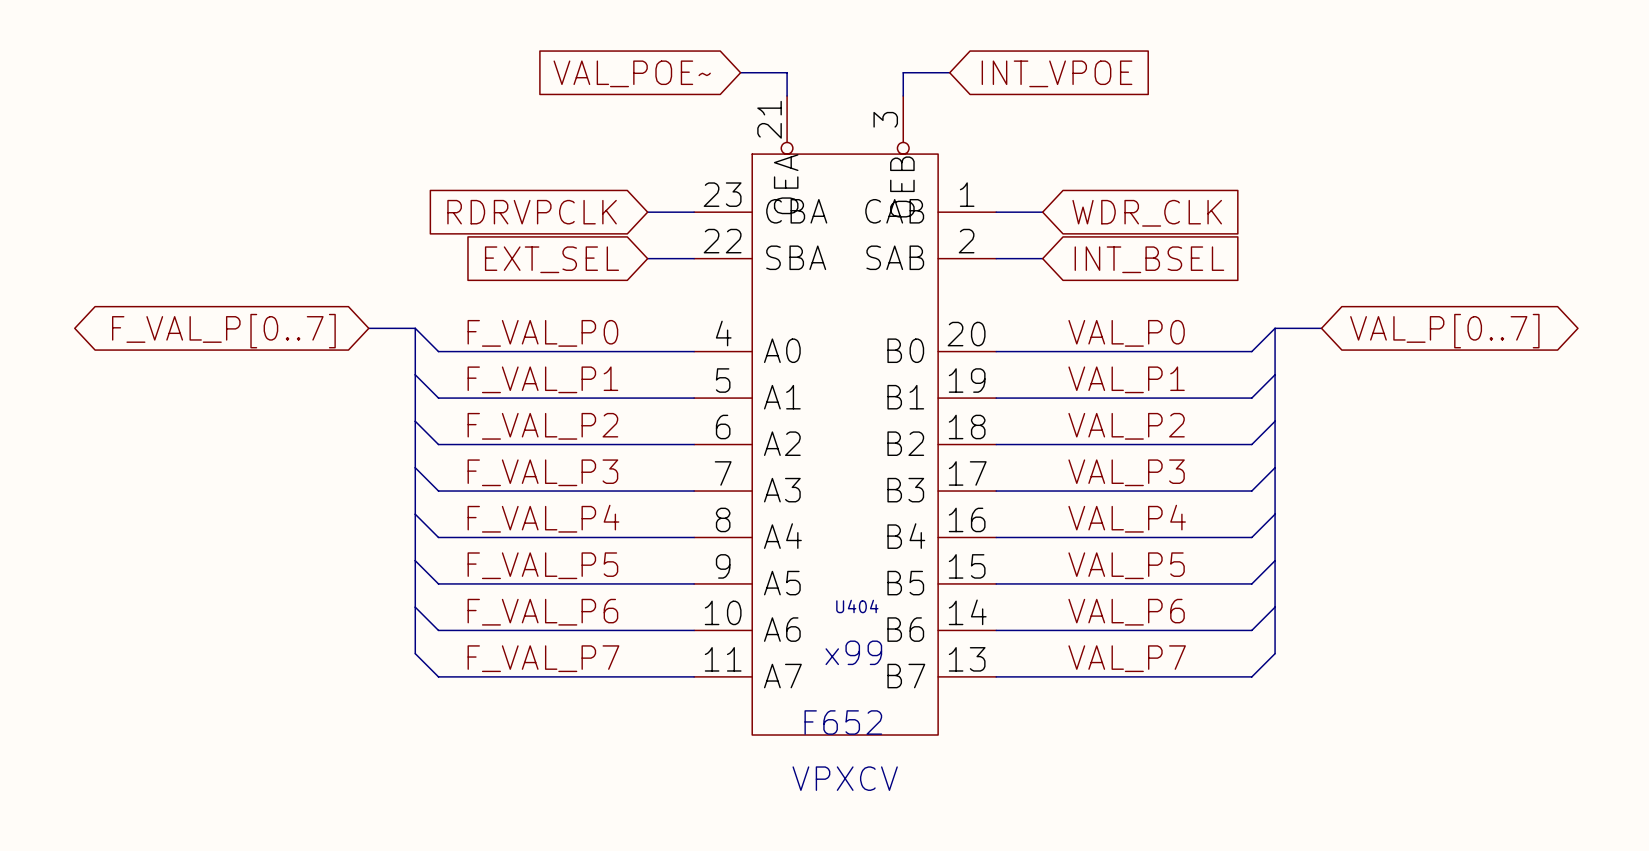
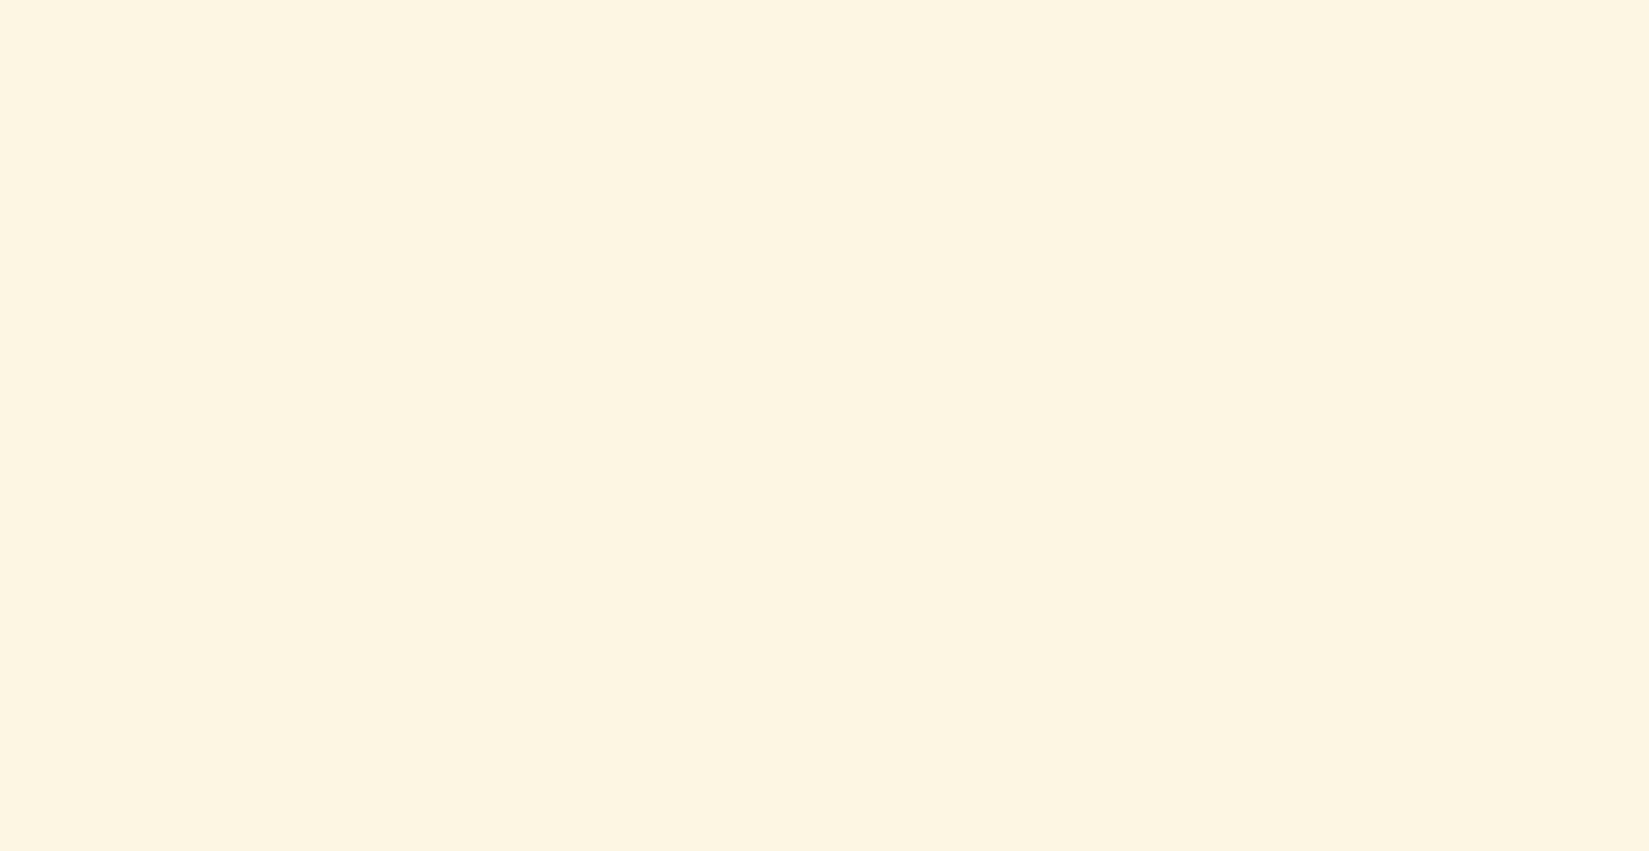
wire: (740, 72) (787, 72) (787, 95) -> none
wire: (949, 72) (903, 72) (903, 95) -> none
global label: VAL_POE~ (632, 73) -> none
global label: INT_VPOE (1057, 73) -> none
global label: RDRVPCLK (532, 212) -> none
wire: (647, 212) (694, 212) -> none
wire: (996, 212) (1042, 212) -> none
global label: WDR_CLK (1147, 213) -> none
wire: (647, 258) (694, 258) -> none
wire: (996, 258) (1042, 258) -> none
global label: EXT_SEL (551, 259) -> none
global label: INT_BSEL (1149, 259) -> none
bus: (368, 328) (415, 328) (415, 653) -> none
wire: (415, 328) (438, 351) (694, 351) -> none
wire: (1275, 328) (1251, 351) (996, 351) -> none
bus: (1321, 328) (1275, 328) (1275, 653) -> none
global label: F_VAL_P[0..7] (223, 331) -> none
global label: VAL_P[0..7] (1444, 331) -> none
label: F_VAL_P0 (542, 333) -> none
label: VAL_P0 (1126, 333) -> none
wire: (415, 374) (438, 398) (694, 398) -> none
wire: (1275, 374) (1251, 398) (996, 398) -> none
label: F_VAL_P1 (542, 379) -> none
label: VAL_P1 (1126, 379) -> none
U404: F652 (845, 415) -> none
wire: (415, 421) (438, 444) (694, 444) -> none
wire: (1275, 421) (1251, 444) (996, 444) -> none
label: F_VAL_P2 (542, 426) -> none
label: VAL_P2 (1126, 426) -> none
wire: (415, 467) (438, 491) (694, 491) -> none
wire: (1275, 467) (1251, 491) (996, 491) -> none
label: F_VAL_P3 (542, 472) -> none
label: VAL_P3 (1126, 472) -> none
wire: (415, 514) (438, 537) (694, 537) -> none
wire: (1275, 514) (1251, 537) (996, 537) -> none
label: F_VAL_P4 (543, 518) -> none
label: VAL_P4 (1127, 518) -> none
wire: (415, 560) (438, 583) (694, 583) -> none
wire: (1275, 560) (1251, 583) (996, 583) -> none
label: F_VAL_P5 (542, 565) -> none
label: VAL_P5 (1126, 565) -> none
wire: (415, 607) (438, 630) (694, 630) -> none
wire: (1275, 607) (1251, 630) (996, 630) -> none
label: F_VAL_P6 (542, 612) -> none
label: VAL_P6 (1126, 612) -> none
wire: (415, 653) (438, 676) (694, 676) -> none
wire: (1275, 653) (1251, 676) (996, 676) -> none
label: F_VAL_P7 (543, 658) -> none
label: VAL_P7 (1127, 658) -> none

